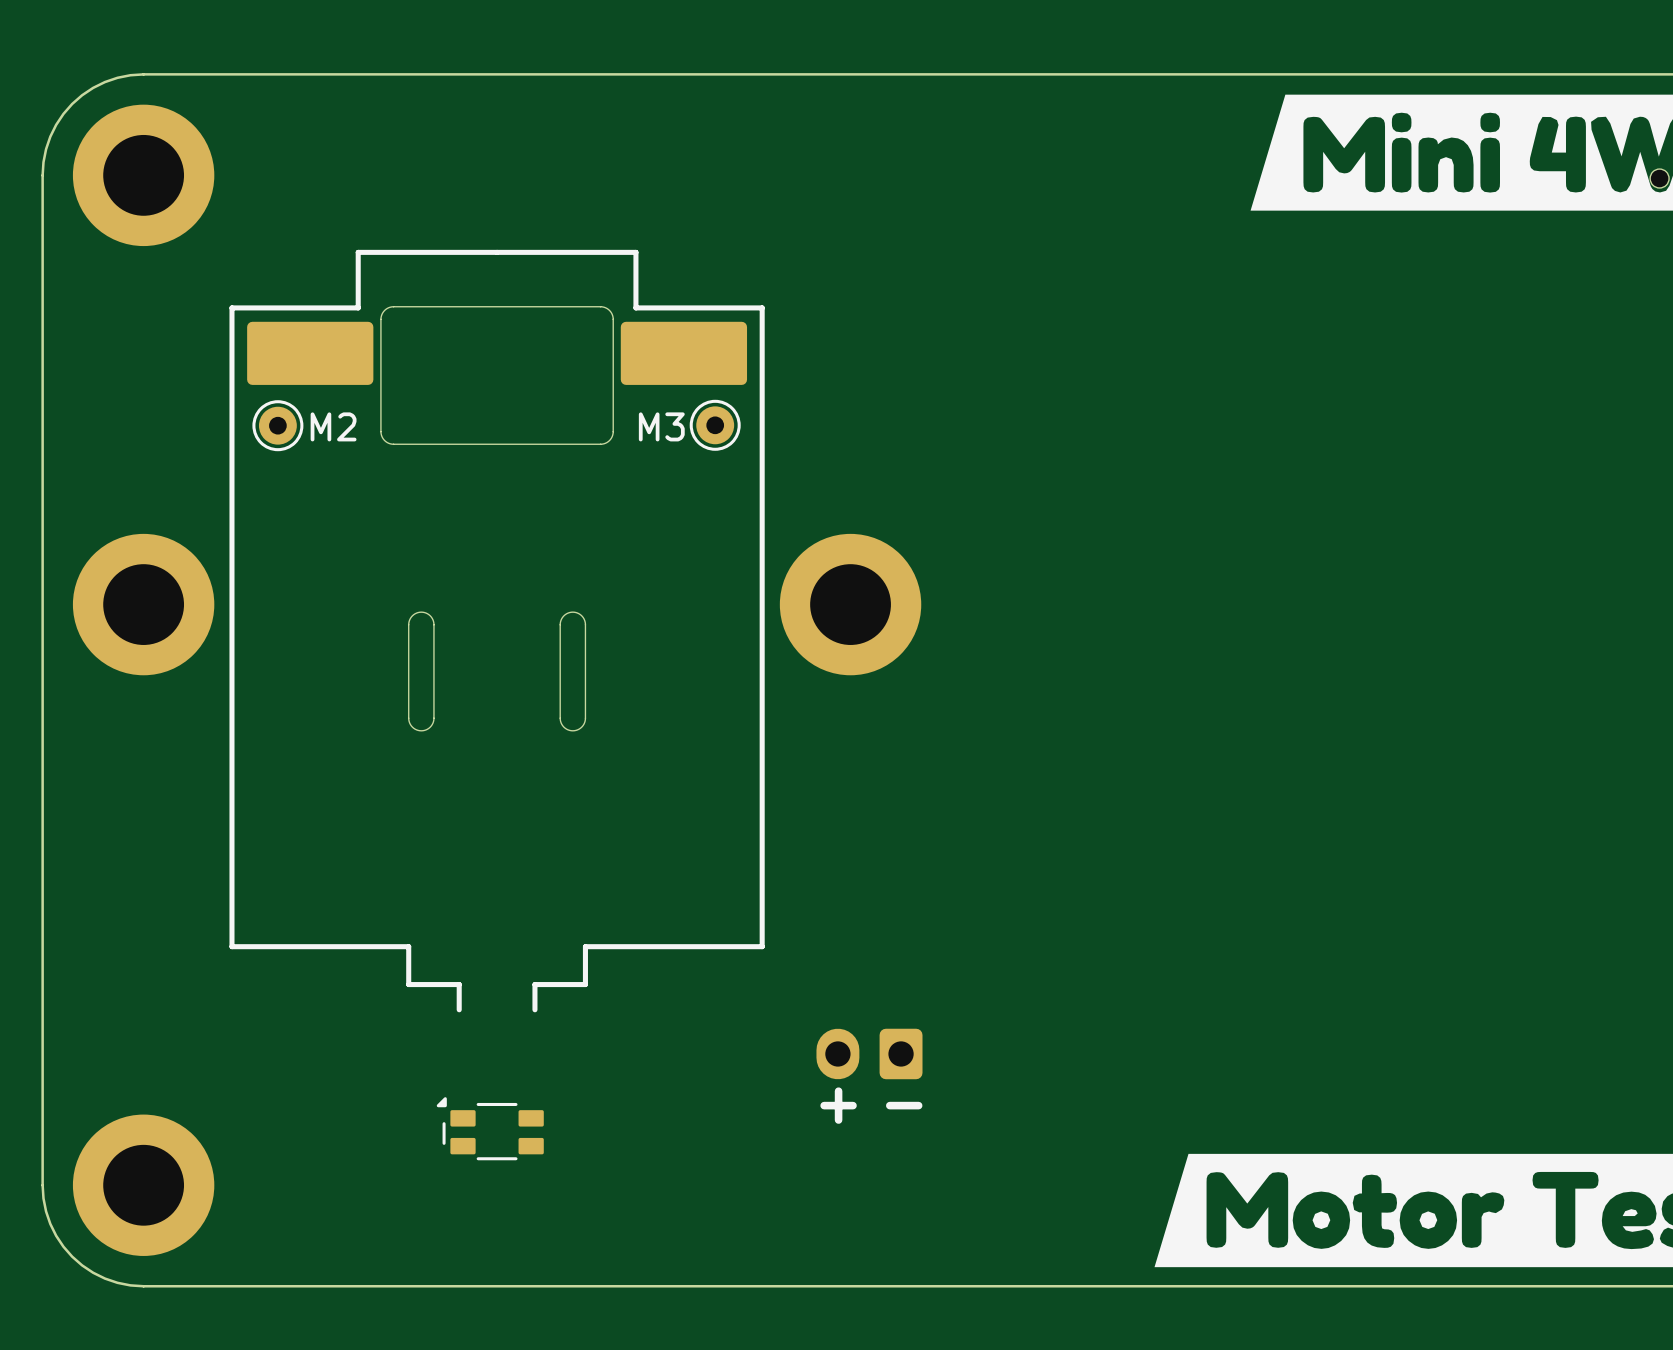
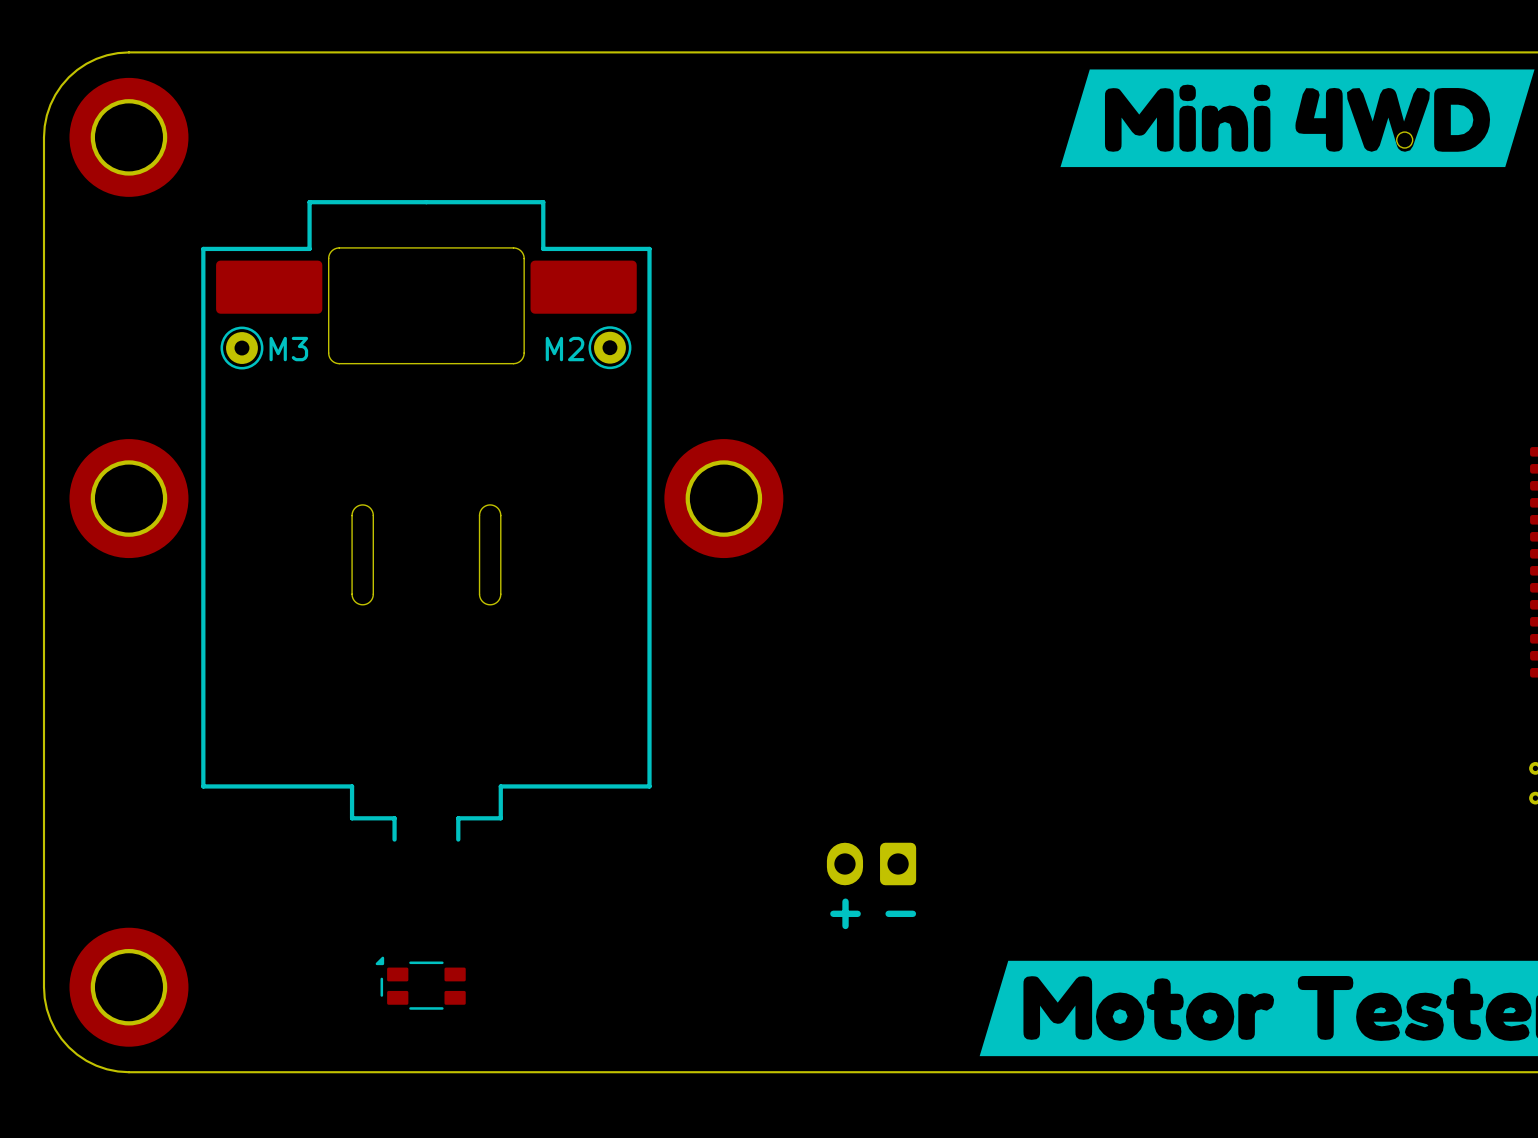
M2 name: M2 (333, 426) -> M3 (288, 349)
M3 name: M3 (661, 426) -> M2 (565, 349)
part position: (869, 1053) -> (871, 863)
text position: + (838, 1105) -> + (845, 913)
text position: - (904, 1105) -> - (900, 913)
part position: (490, 1128) -> (420, 983)

